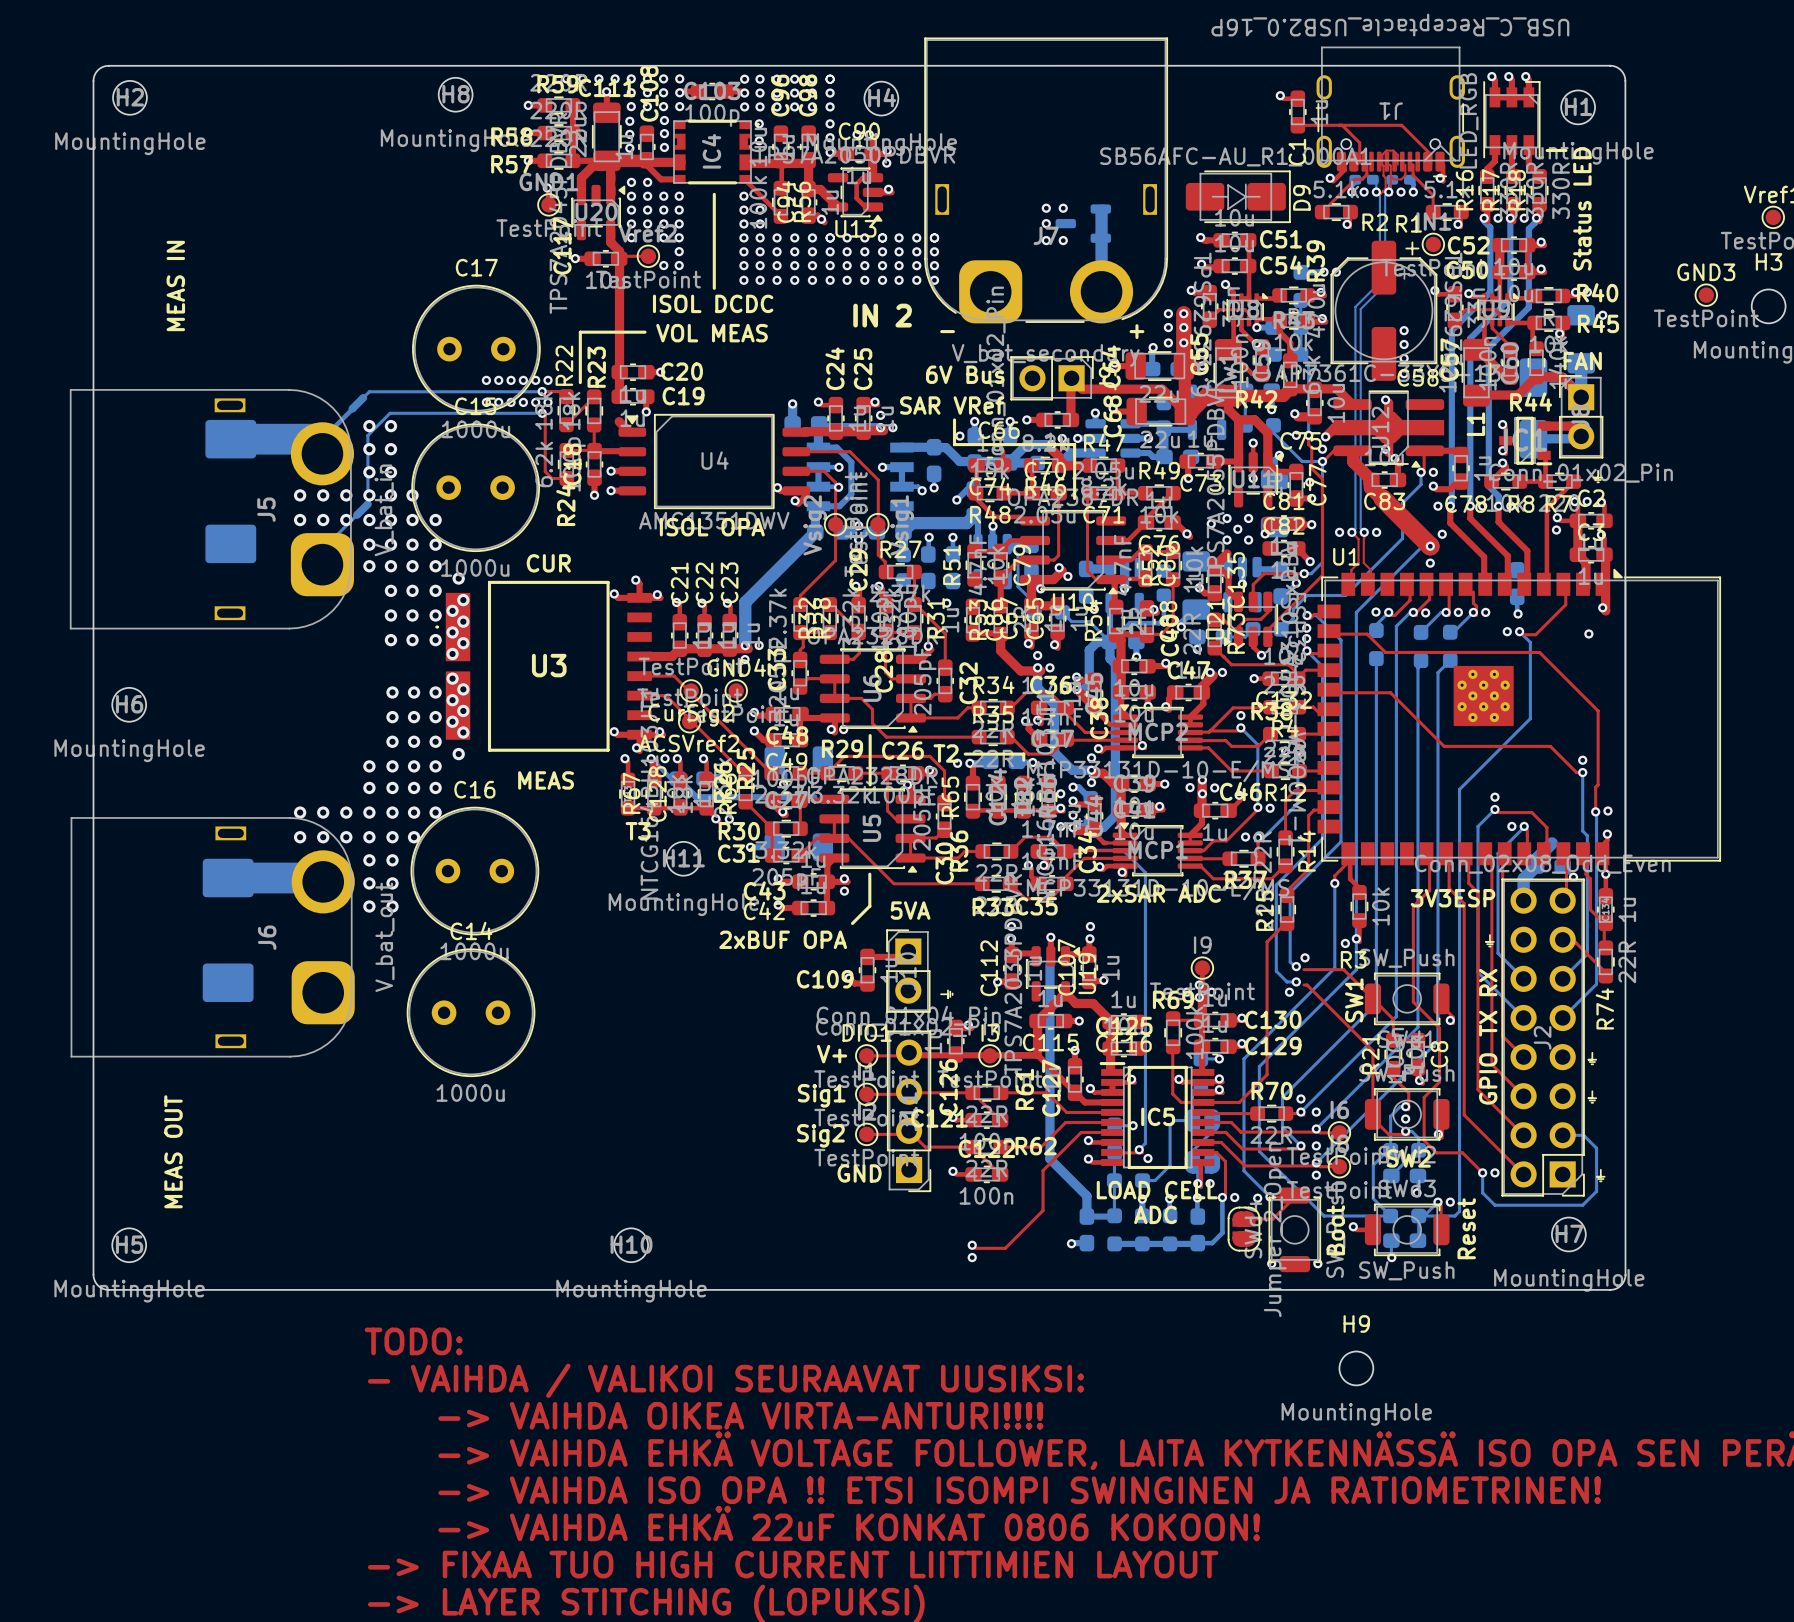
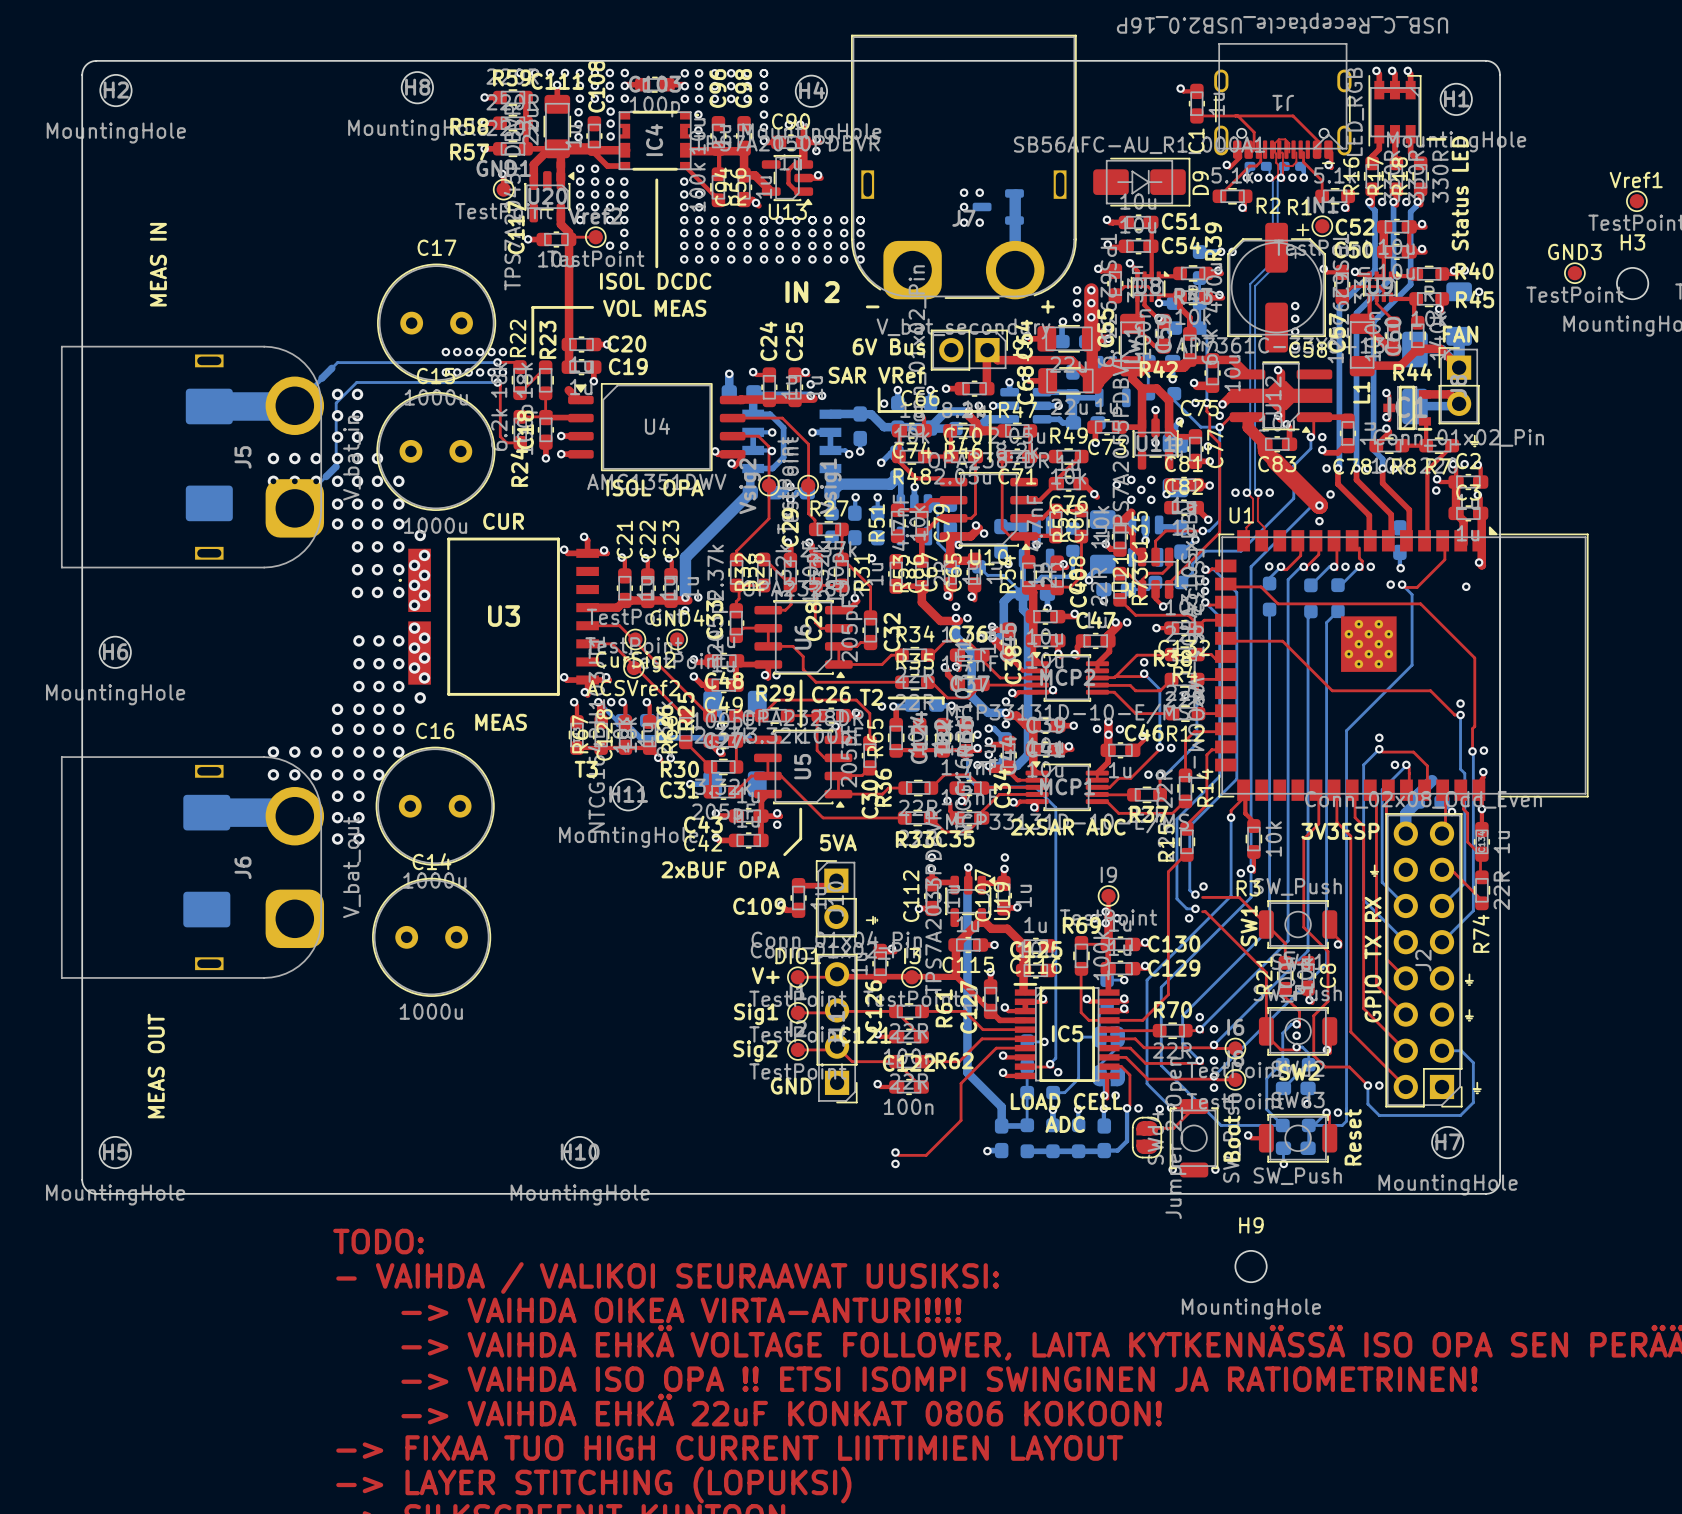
J5 position: (211, 509) -> (192, 457)

